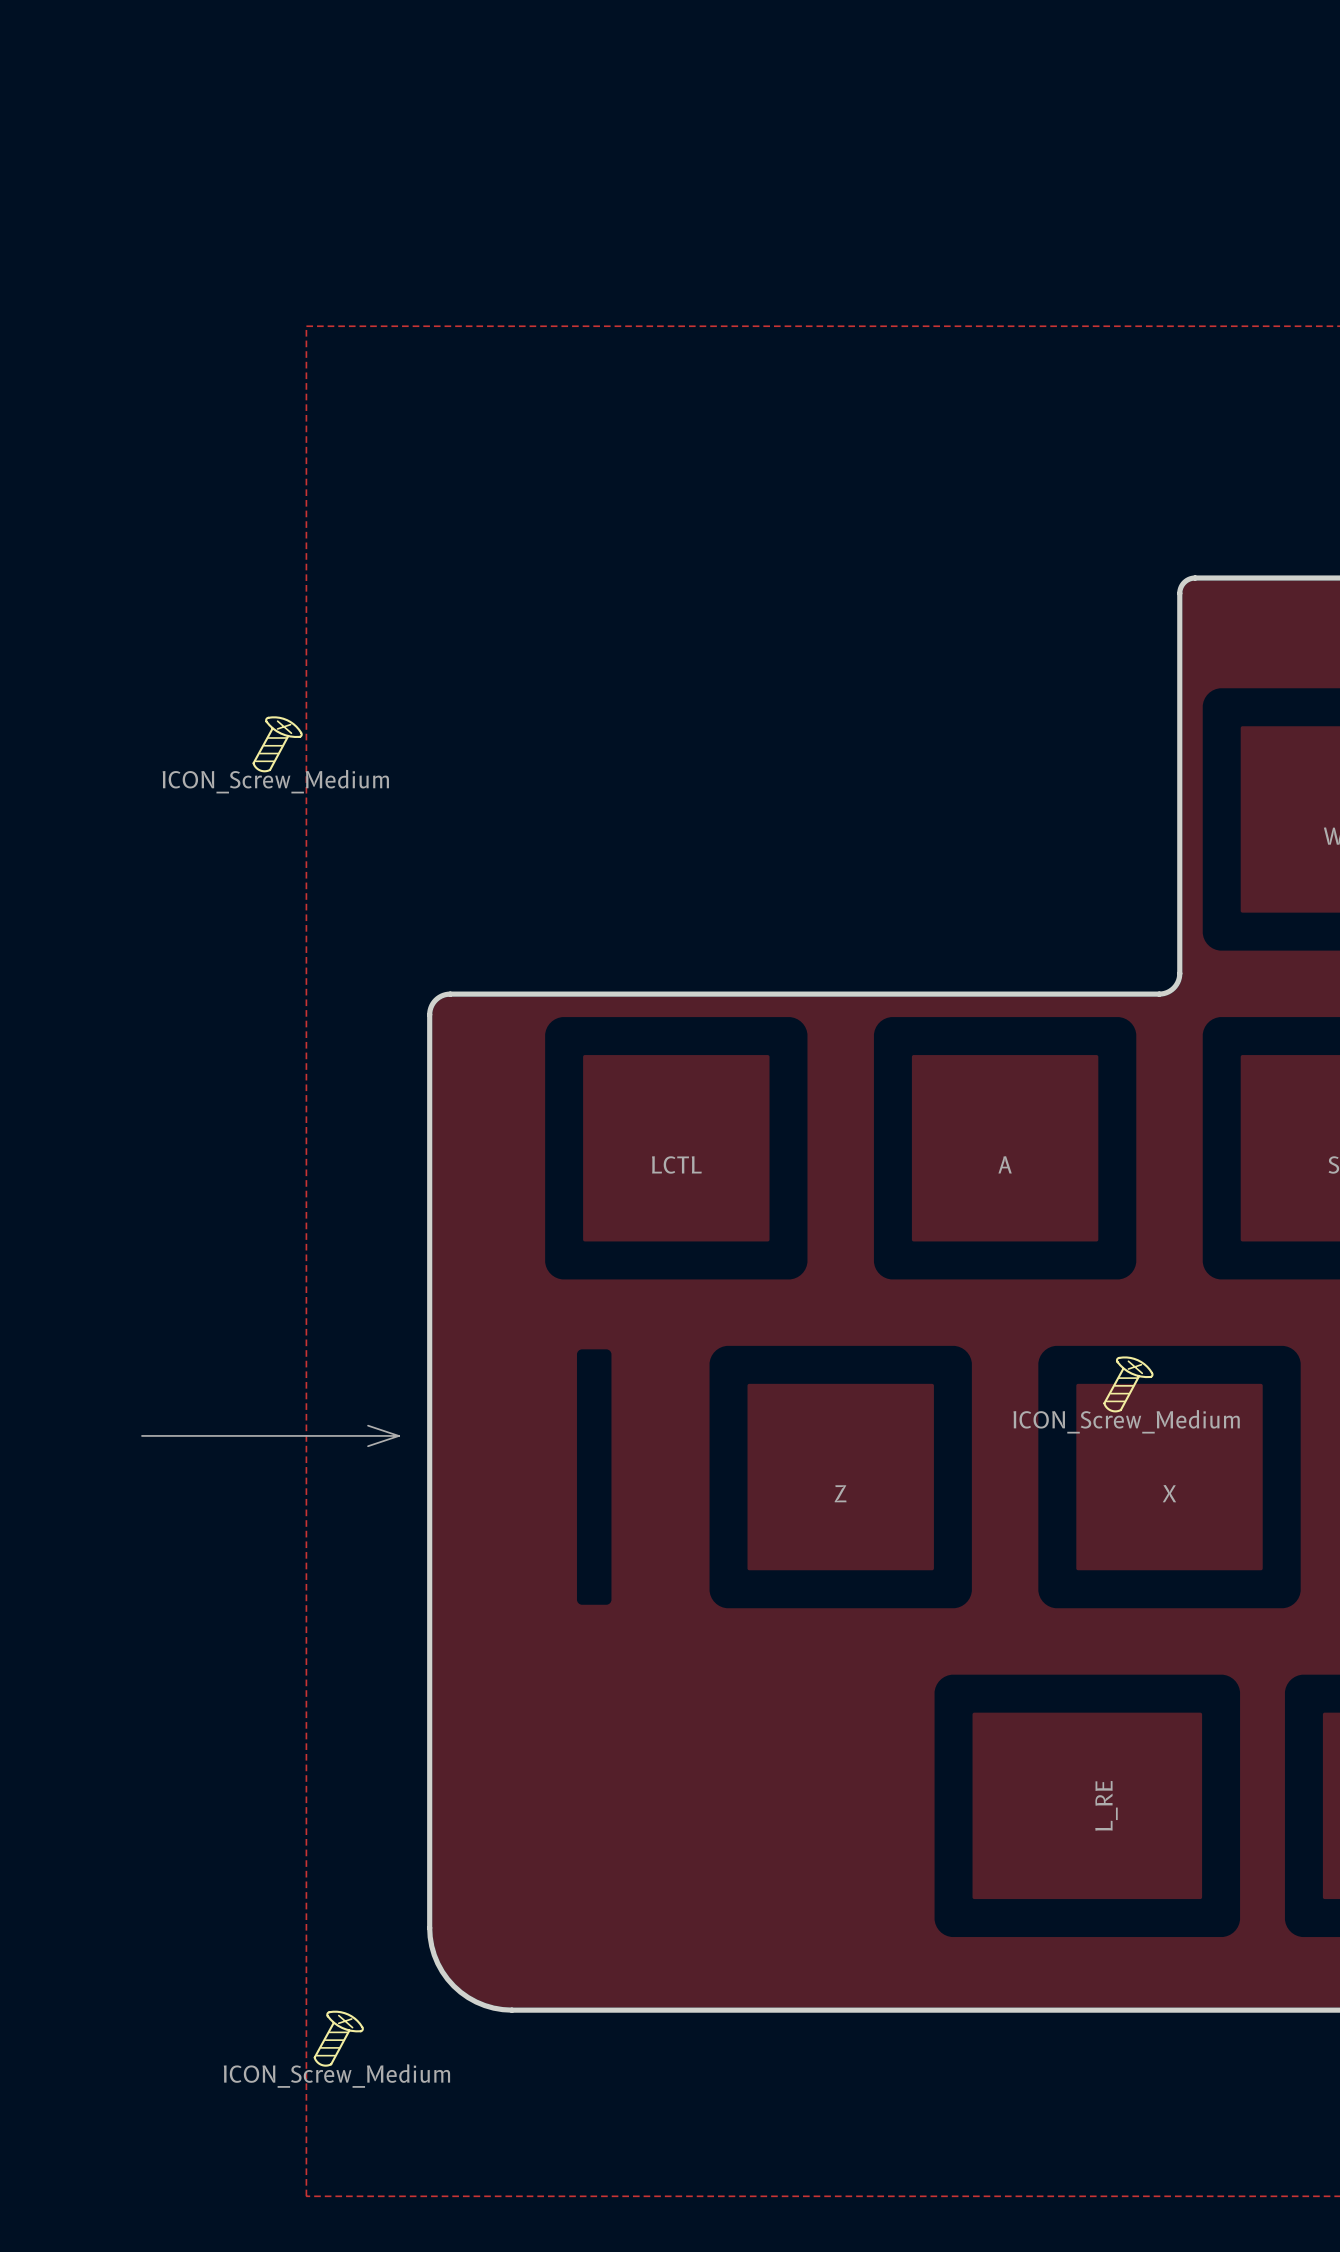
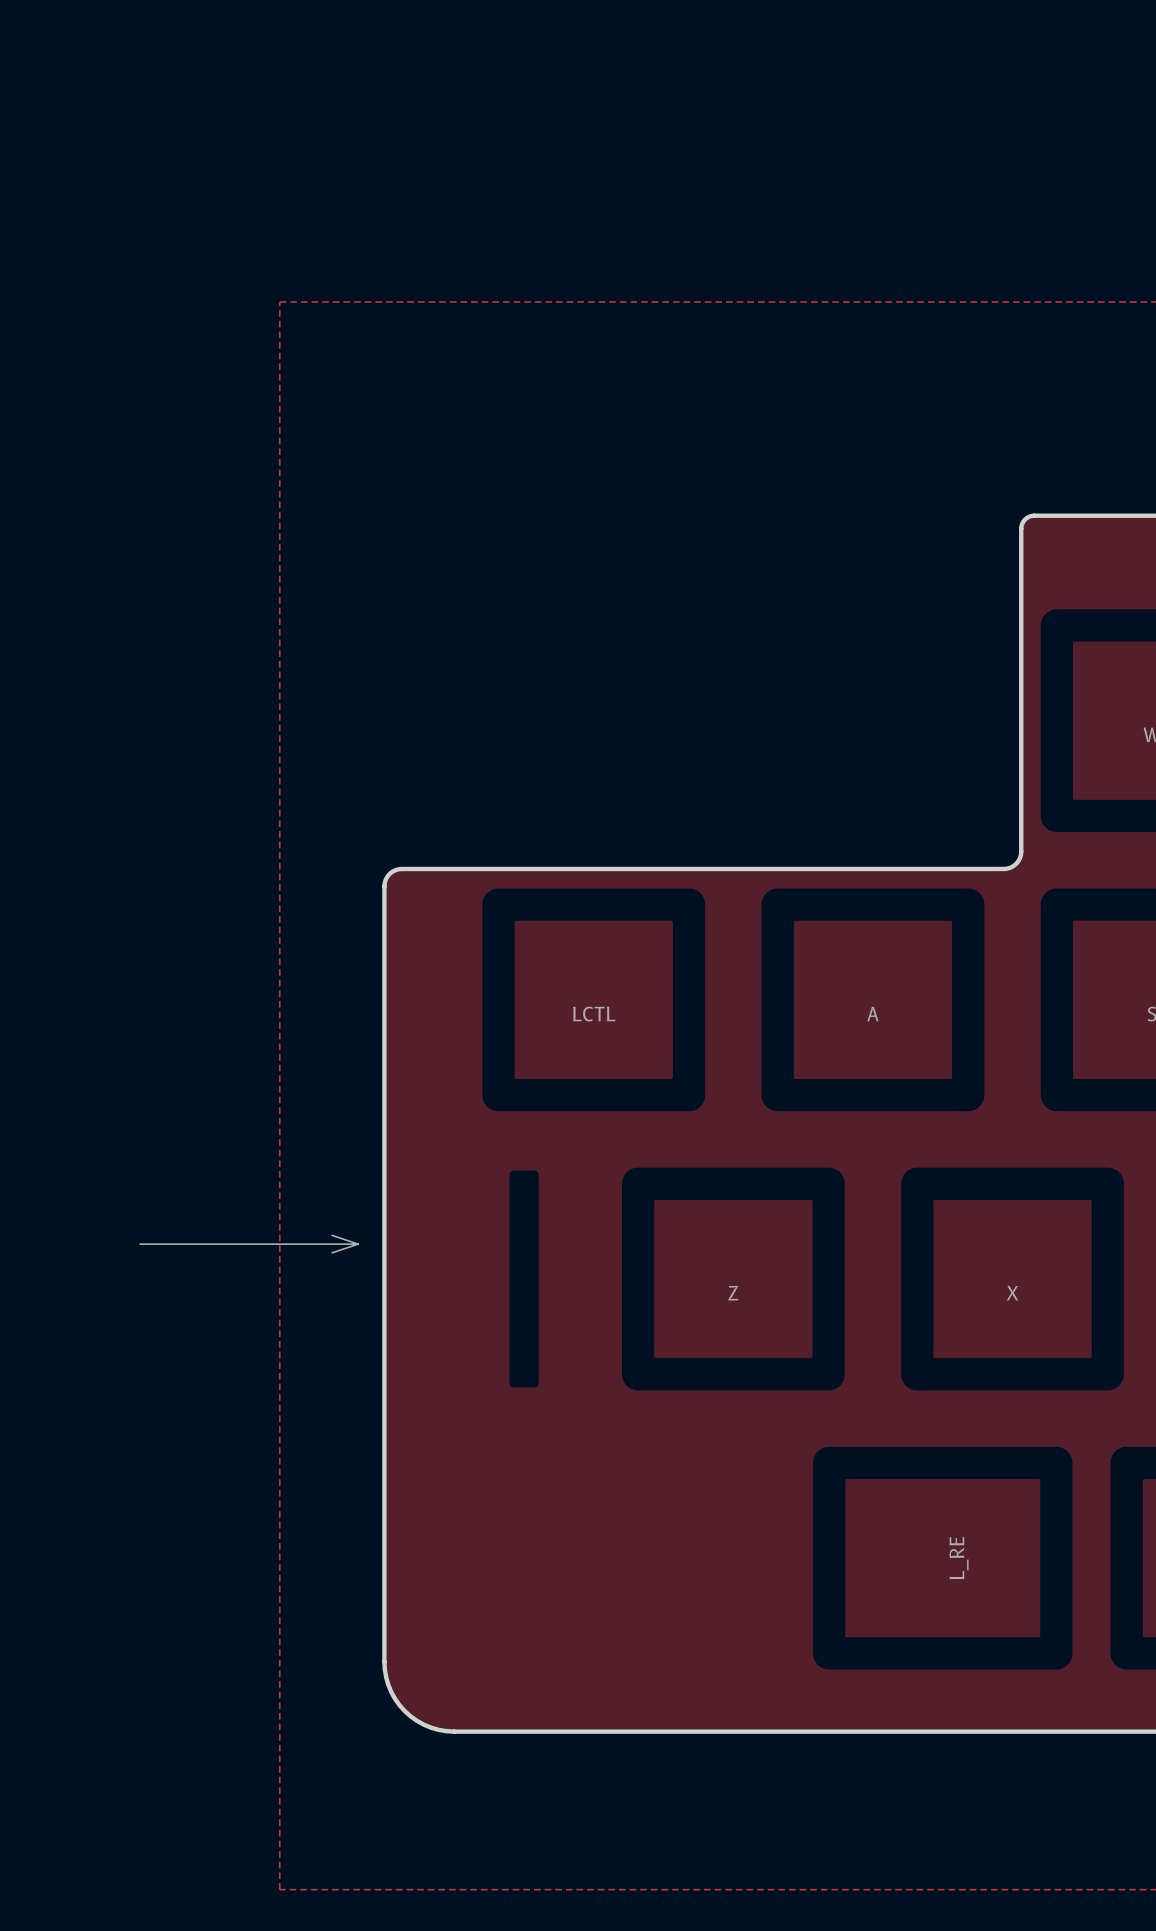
drawing: [252, 716, 303, 773] -> none
drawing: [1103, 1356, 1154, 1413] -> none
drawing: [313, 2010, 364, 2067] -> none

